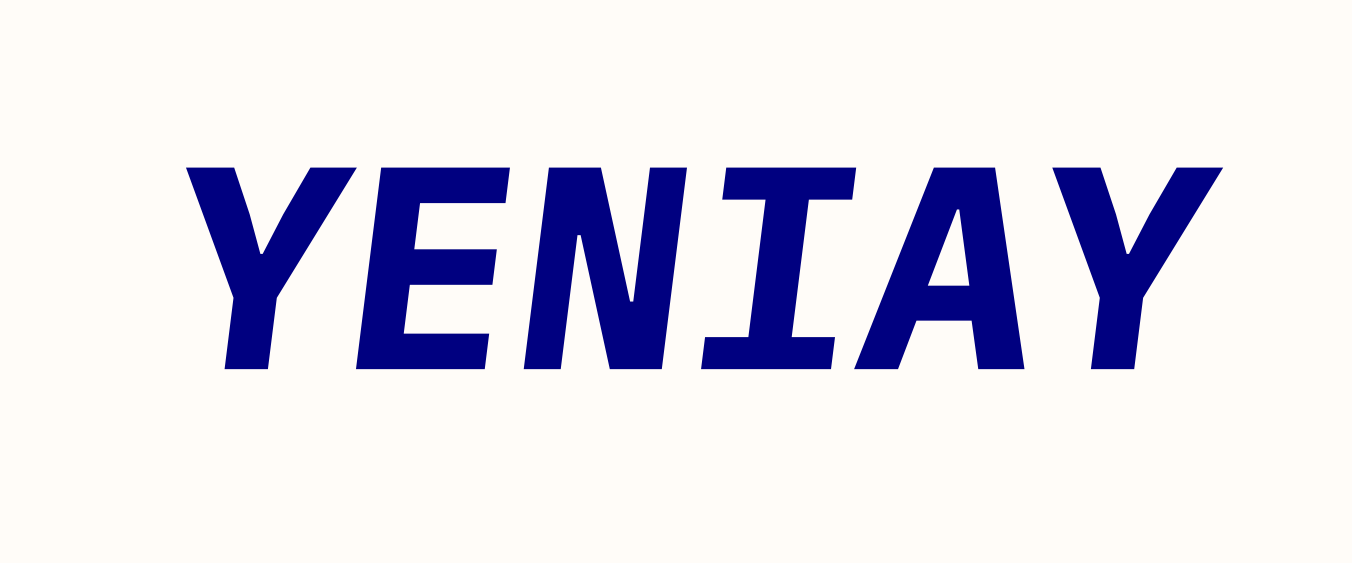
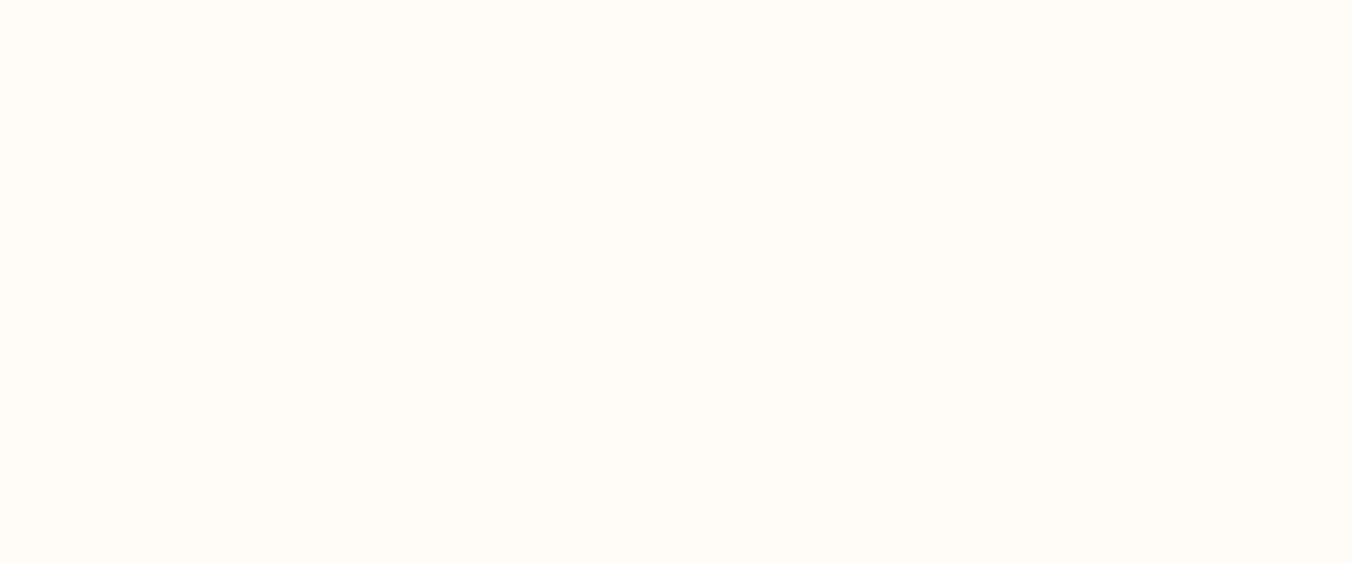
text: YENIAY (704, 268) -> none

